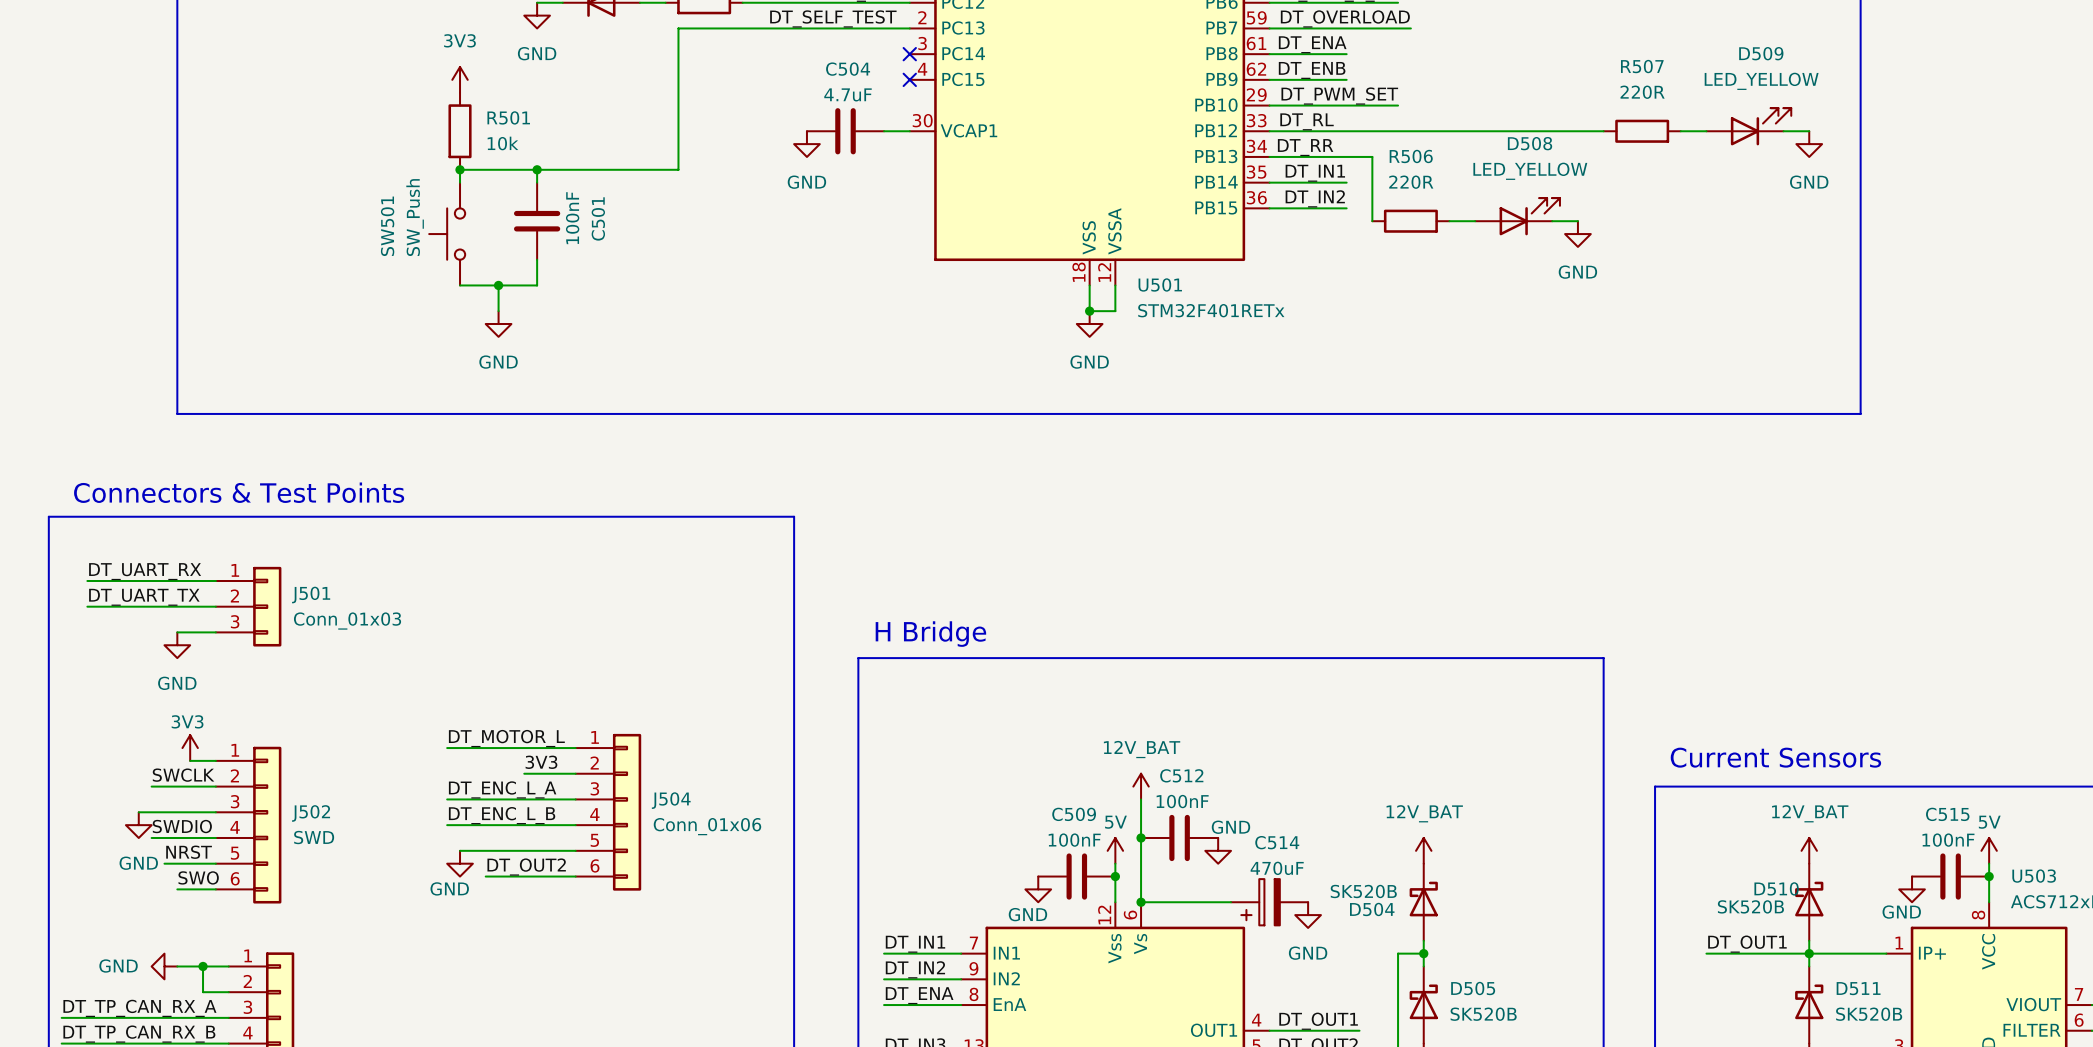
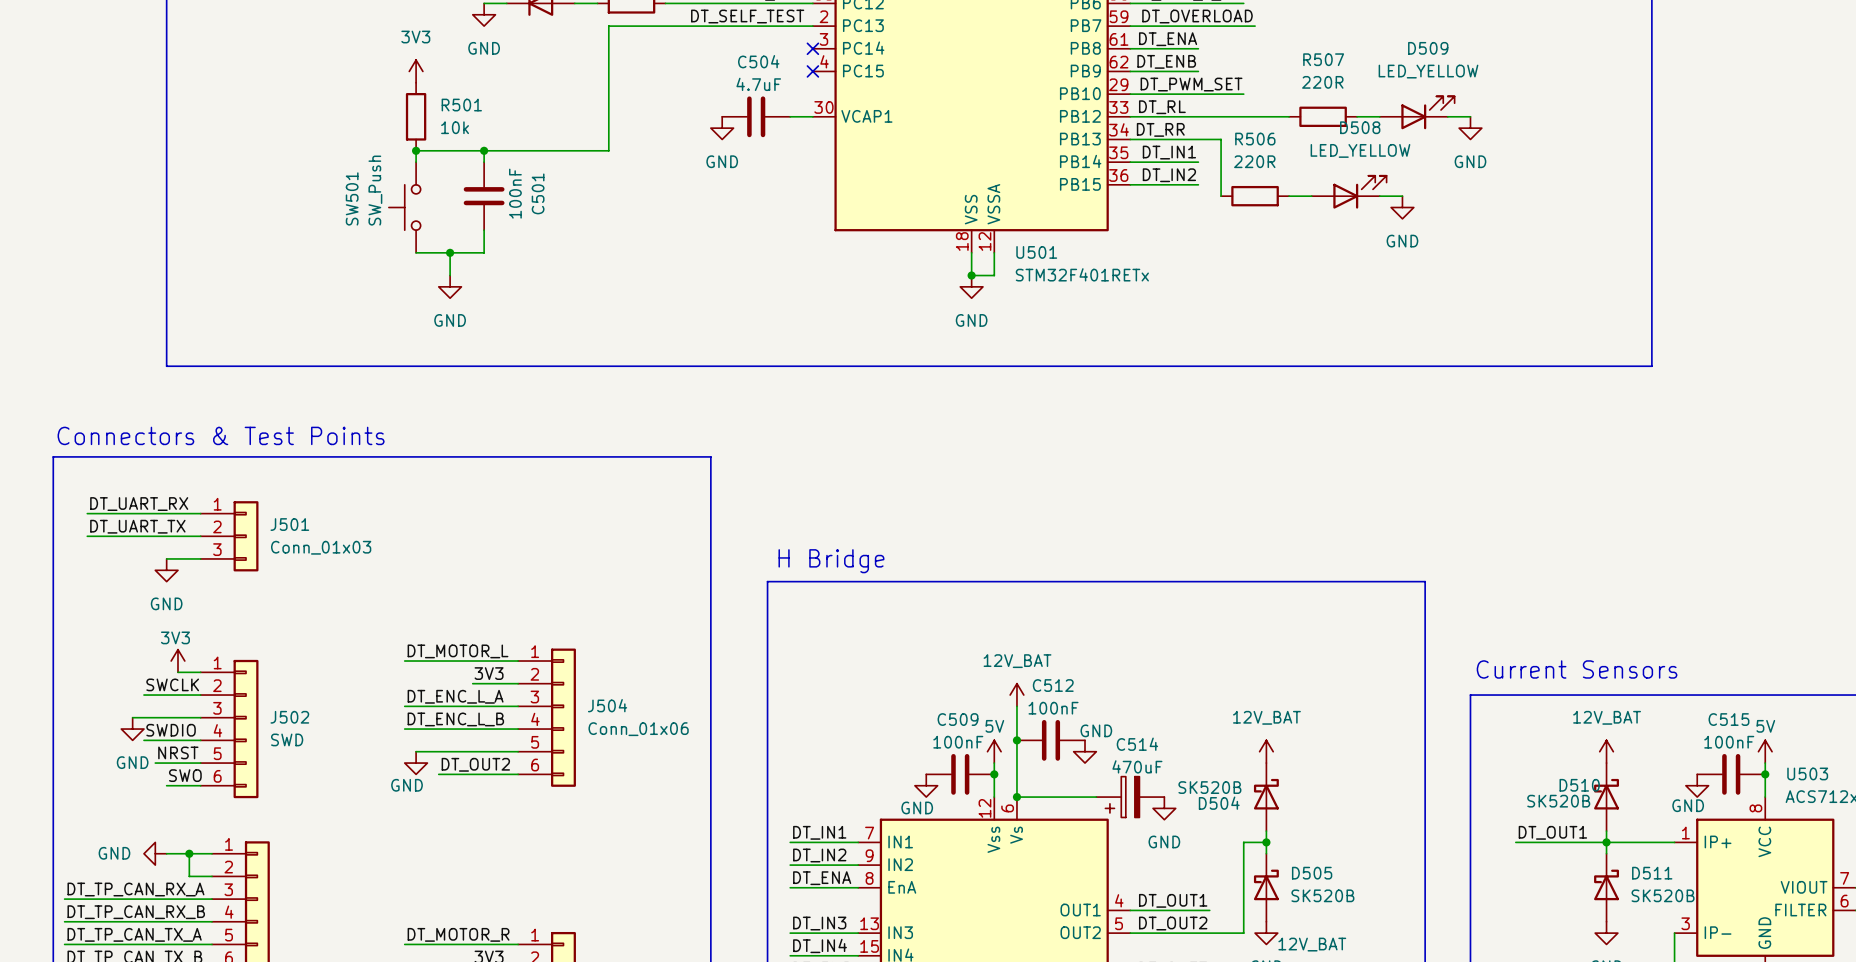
D509 position: (1748, 126) -> (1417, 112)
wire: (1449, 131) (1526, 131) -> none
R507 position: (1642, 131) -> (1323, 116)
wire: (1680, 131) (1706, 131) -> (1447, 116) (1470, 116)
wire: (1783, 131) (1809, 131) -> none
power symbol position: GND (1809, 144) -> GND (1470, 128)

